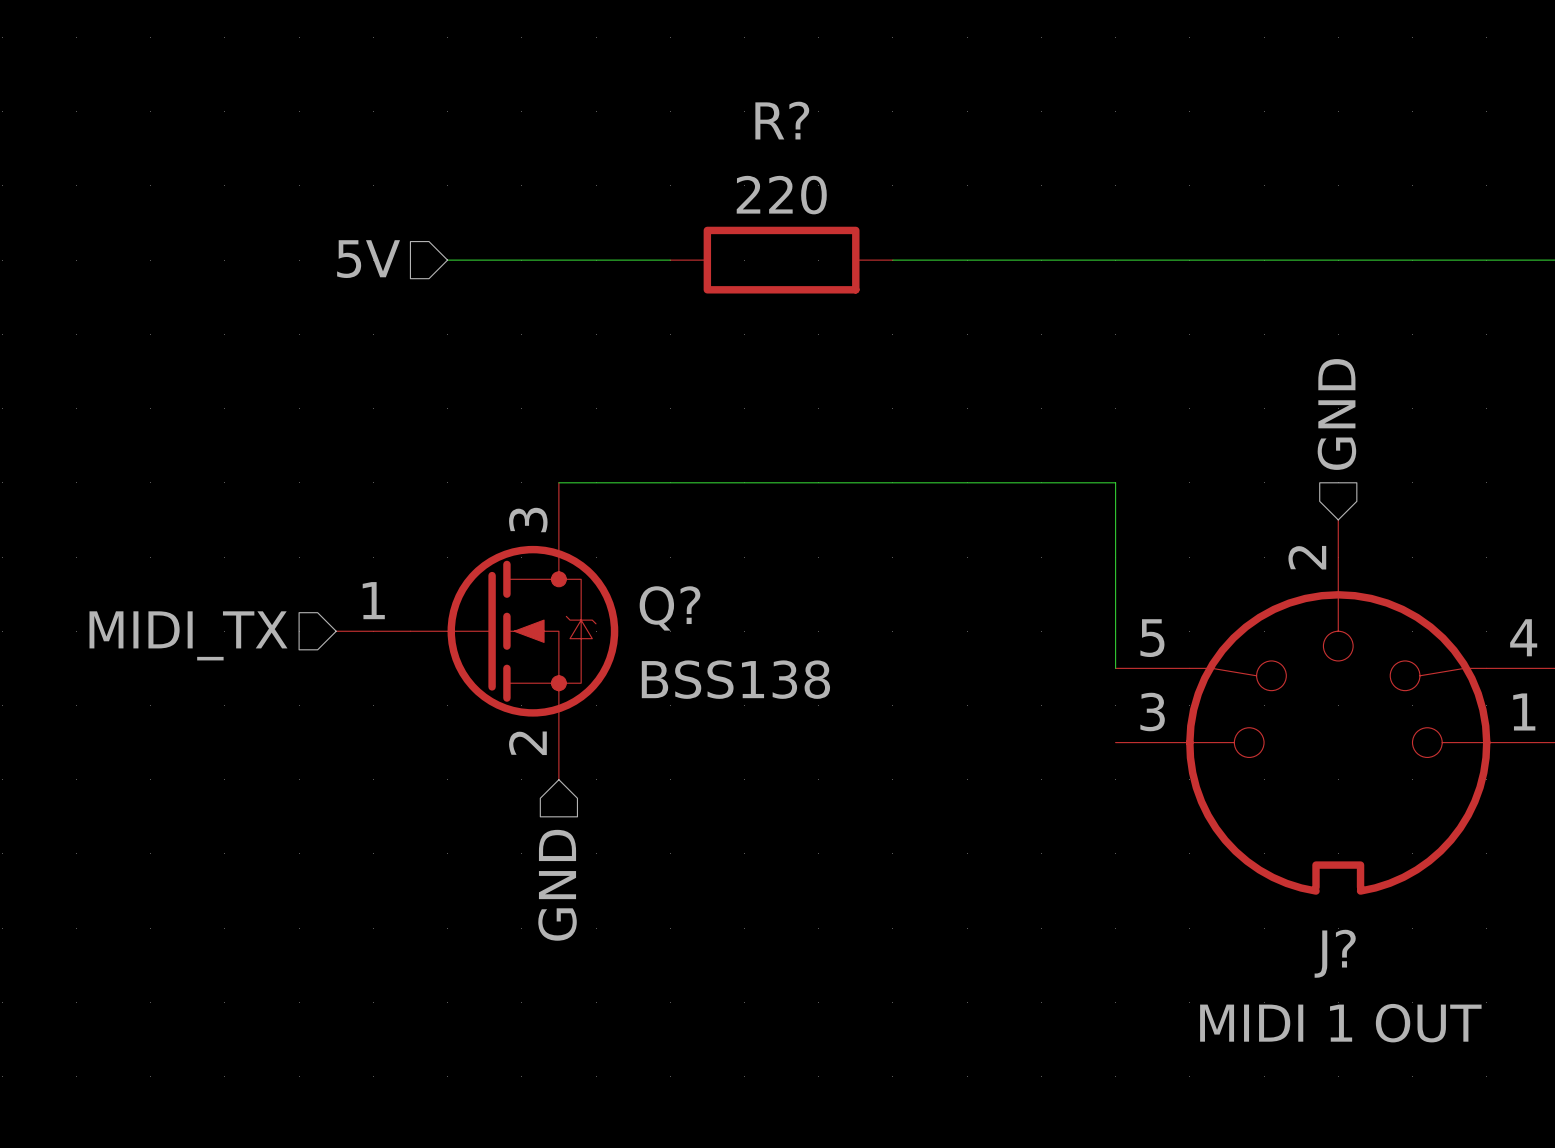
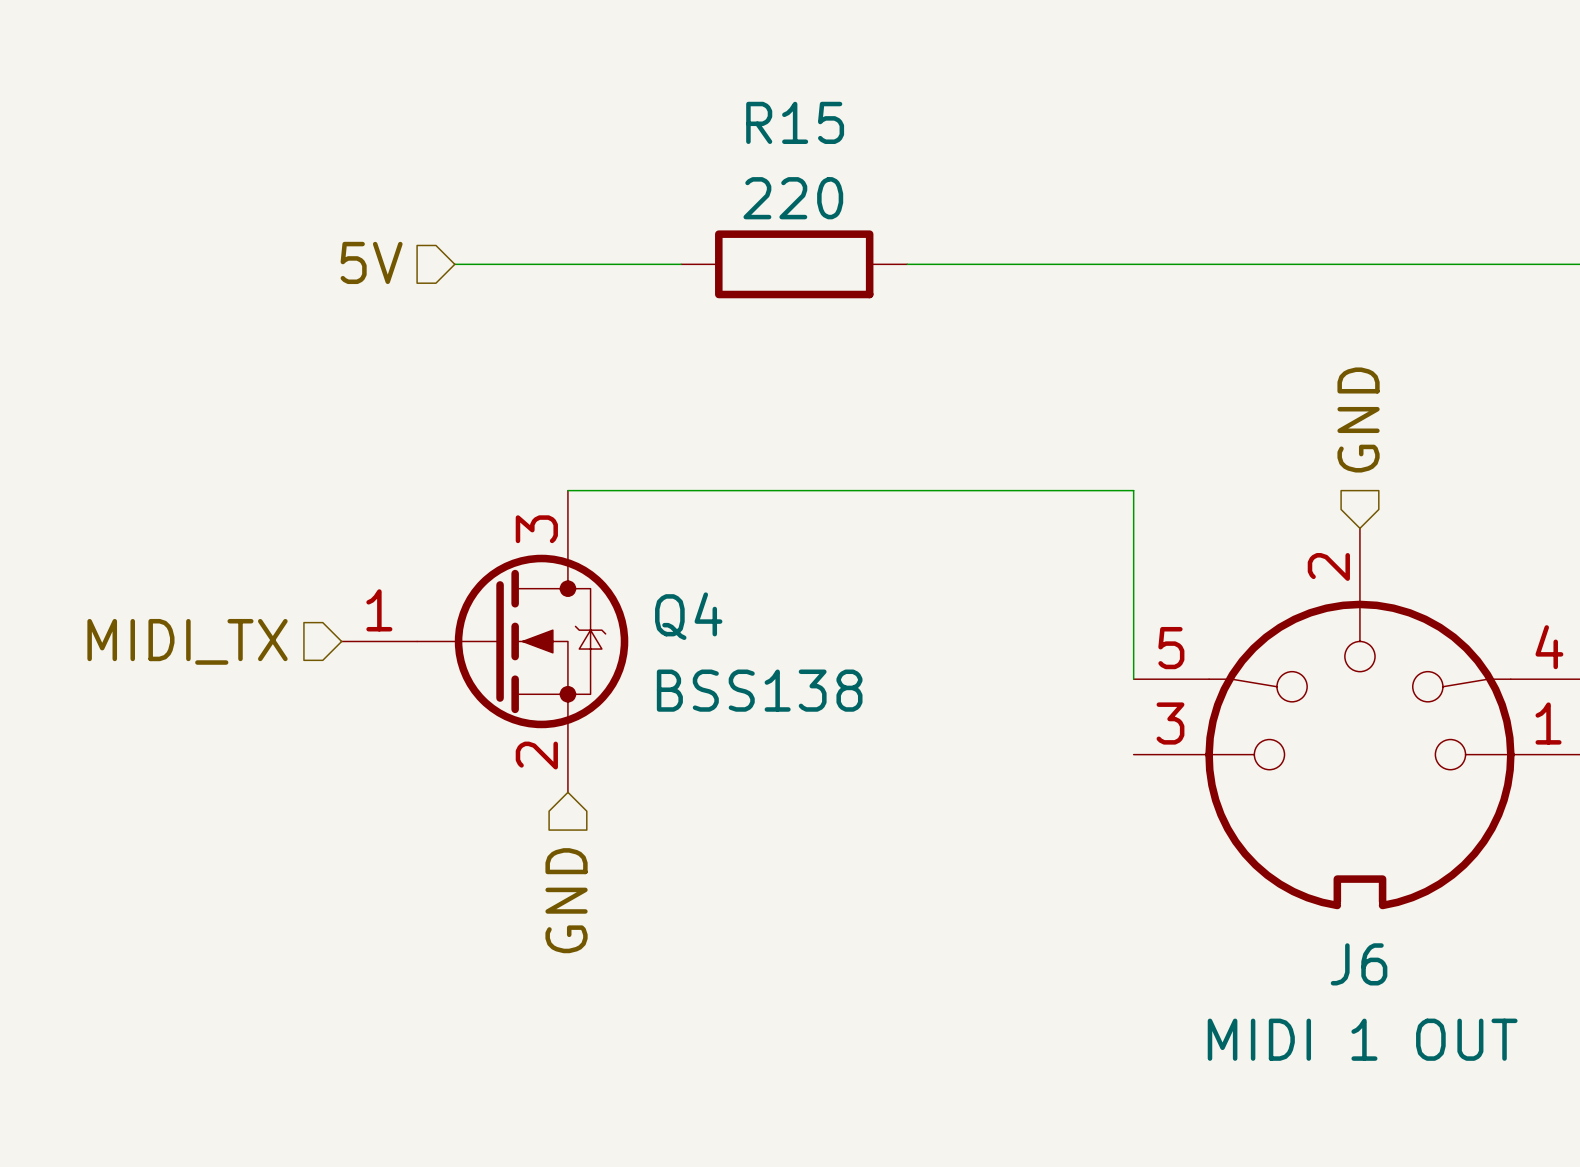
R? name: R? (782, 120) -> R15 (795, 122)
Q? name: Q? (670, 608) -> Q4 (688, 616)
J? name: J? (1335, 953) -> J6 (1359, 964)

